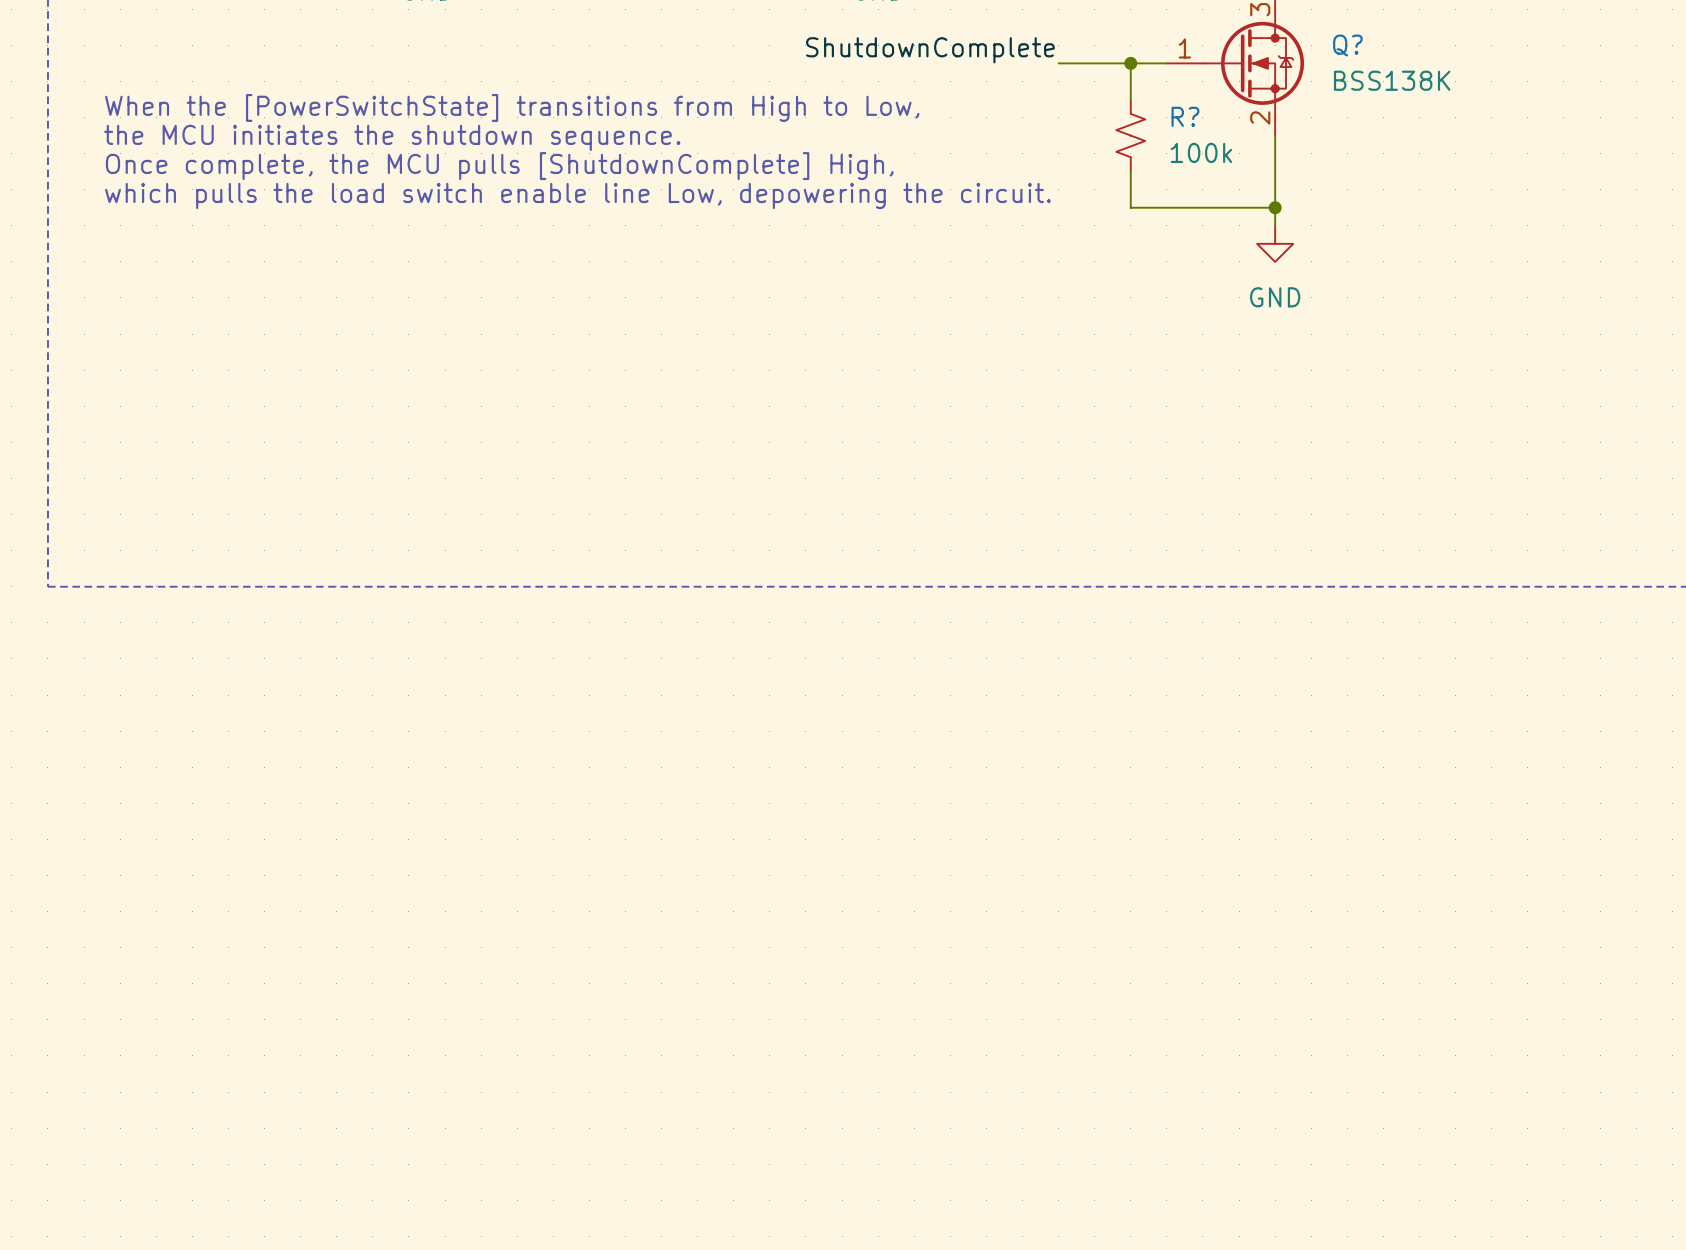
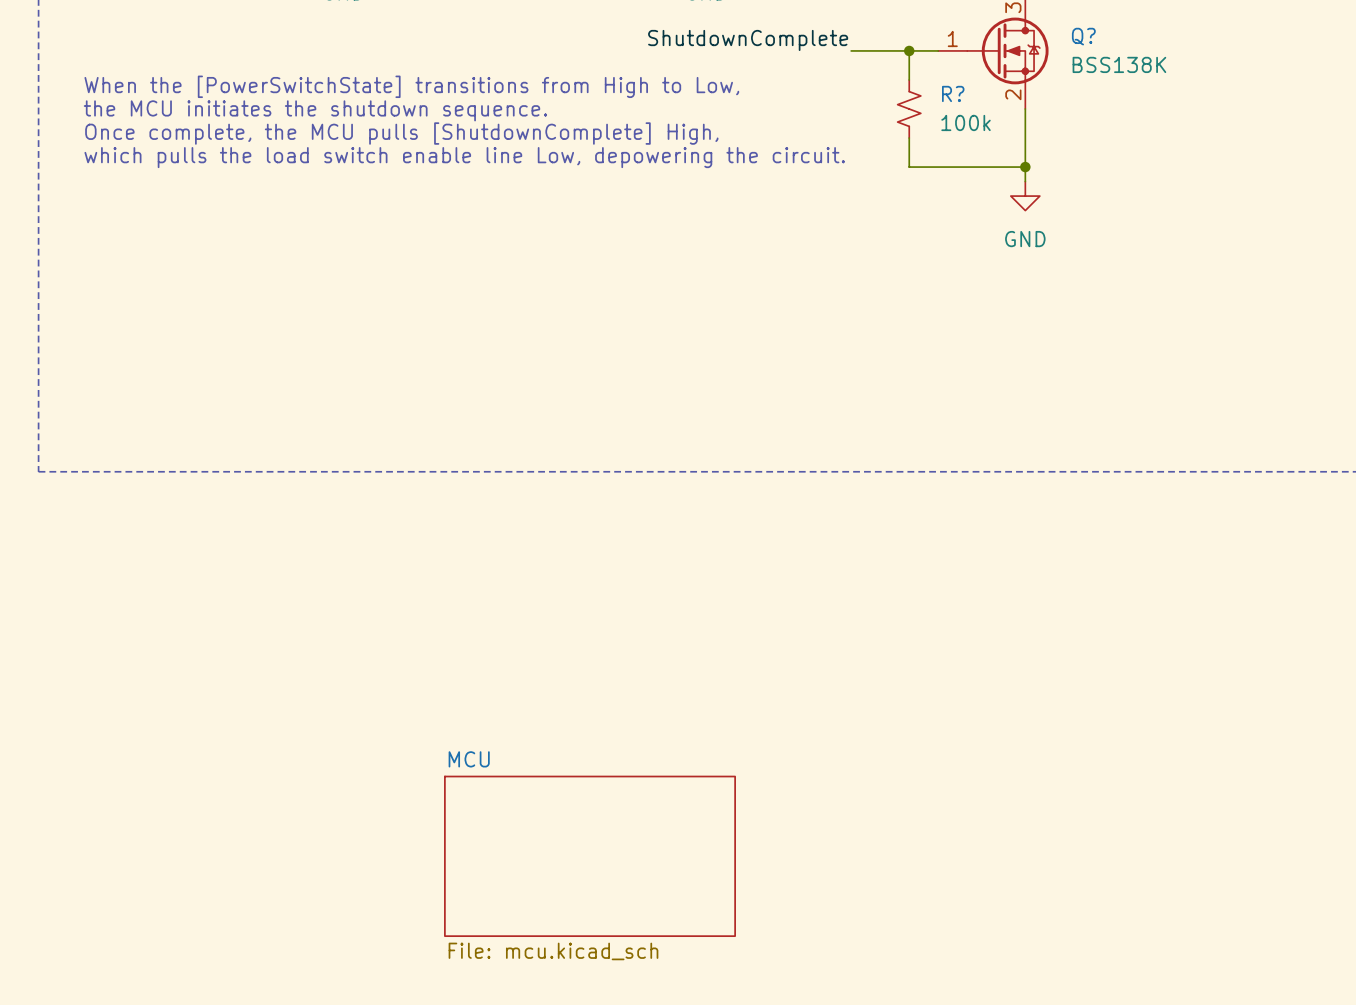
sheet MCU: none -> File: mcu.kicad_sch (590, 856)

